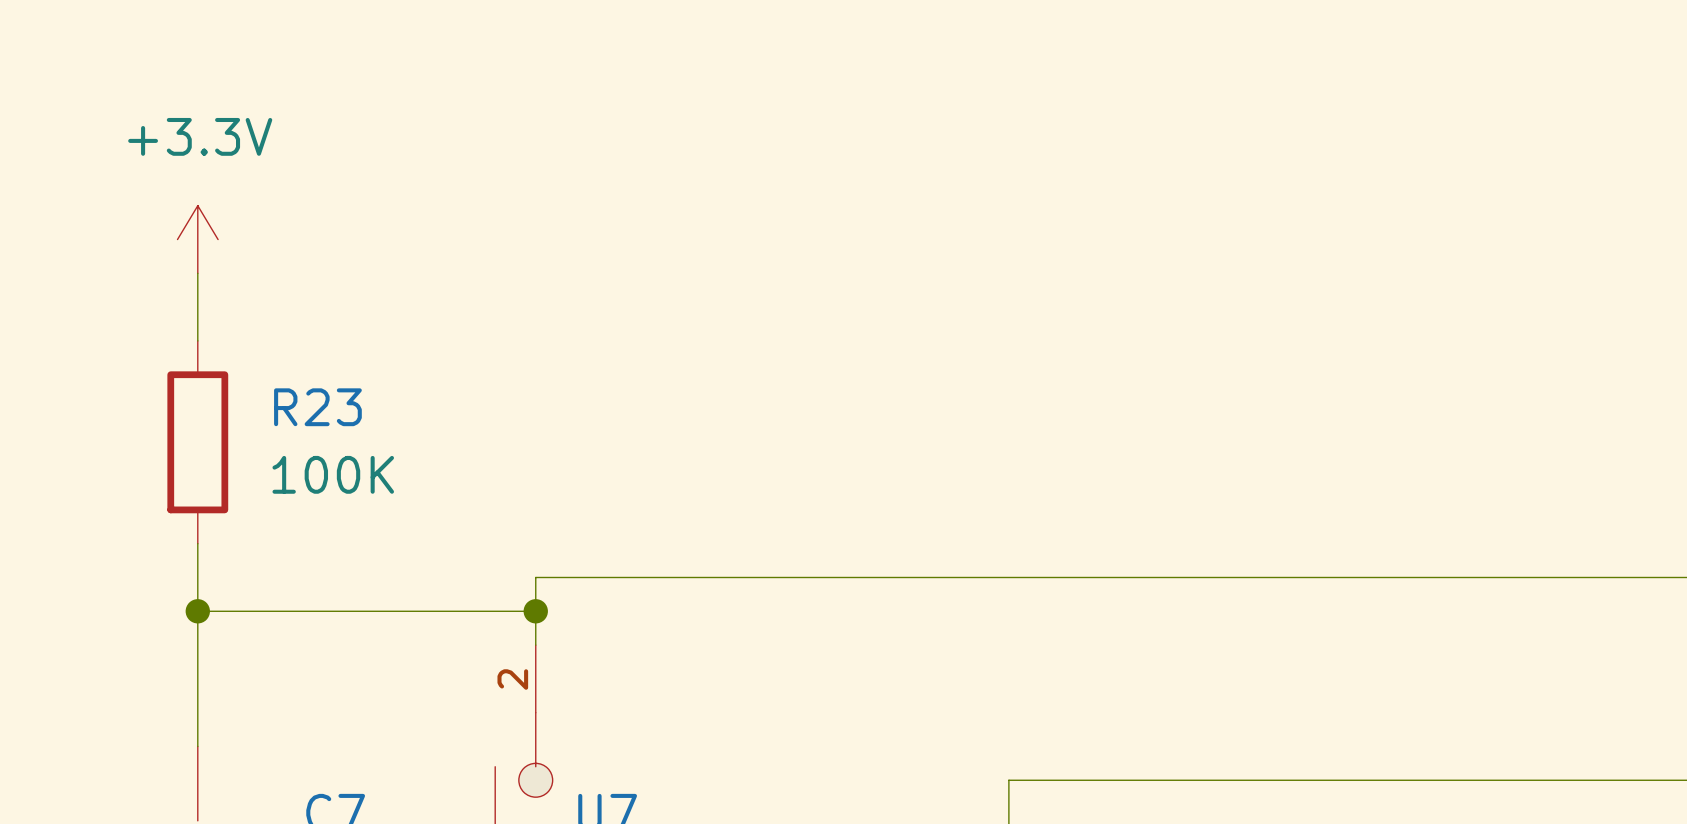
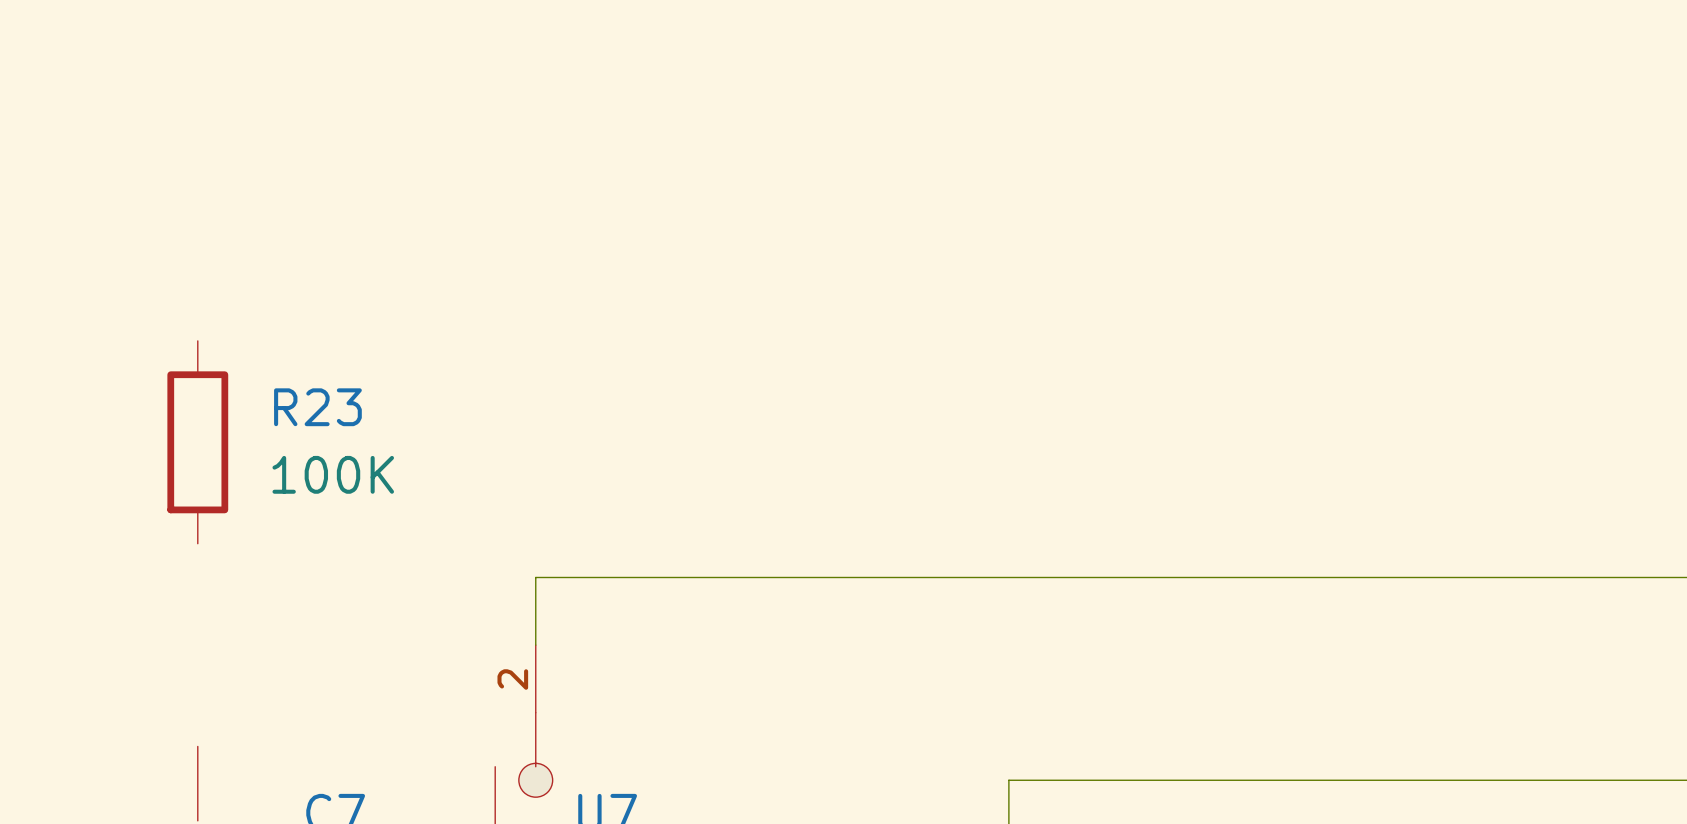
power symbol: +3.3V (197, 239) -> none
wire: (197, 273) (197, 340) -> none
wire: (197, 543) (197, 746) -> none
wire: (197, 611) (535, 611) -> none
junction: (197, 611) -> none
junction: (535, 611) -> none

